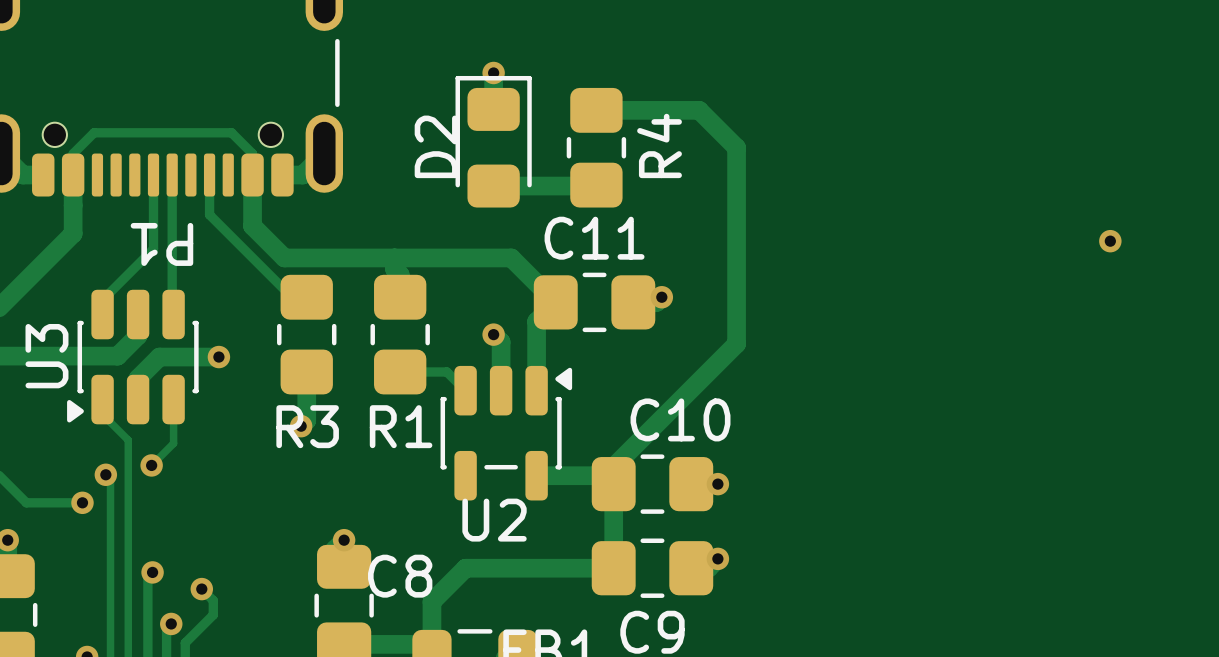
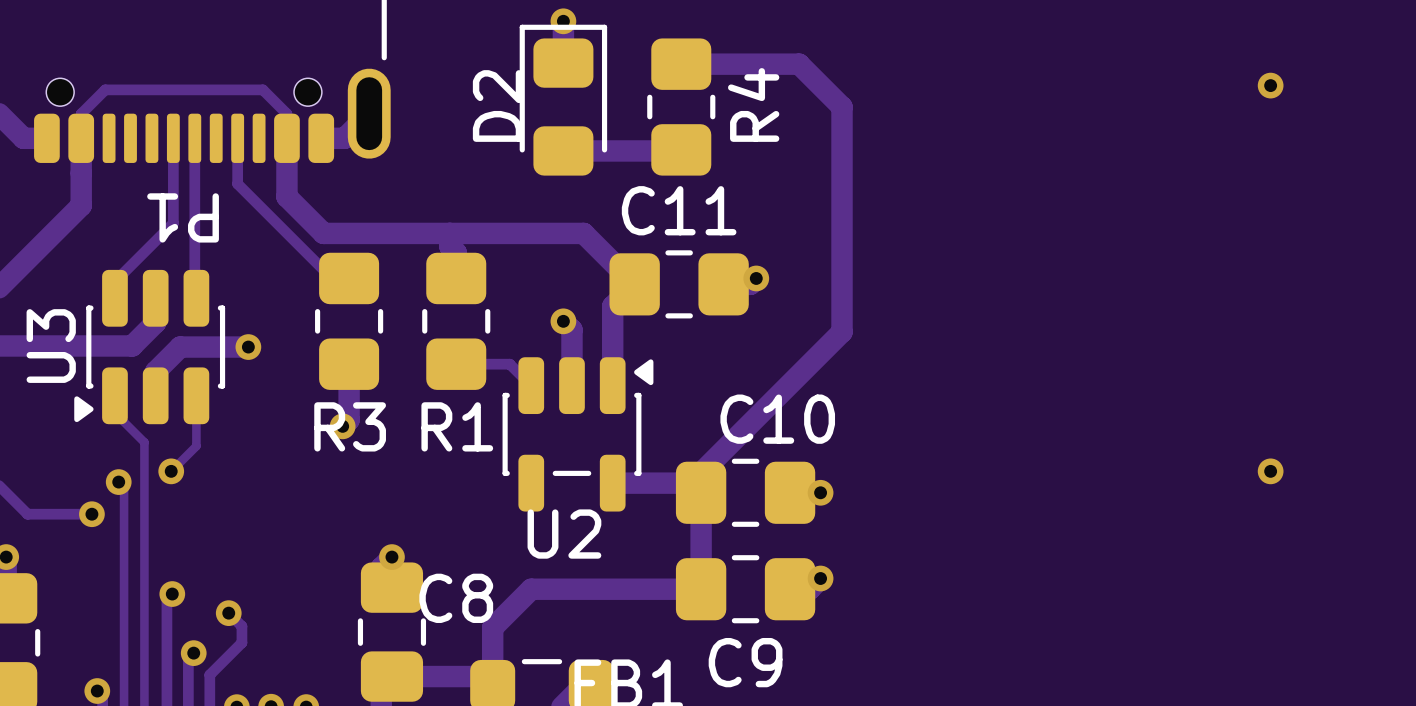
via: none -> (1270, 85)
via: (1110, 241) -> none
via: none -> (1270, 471)

